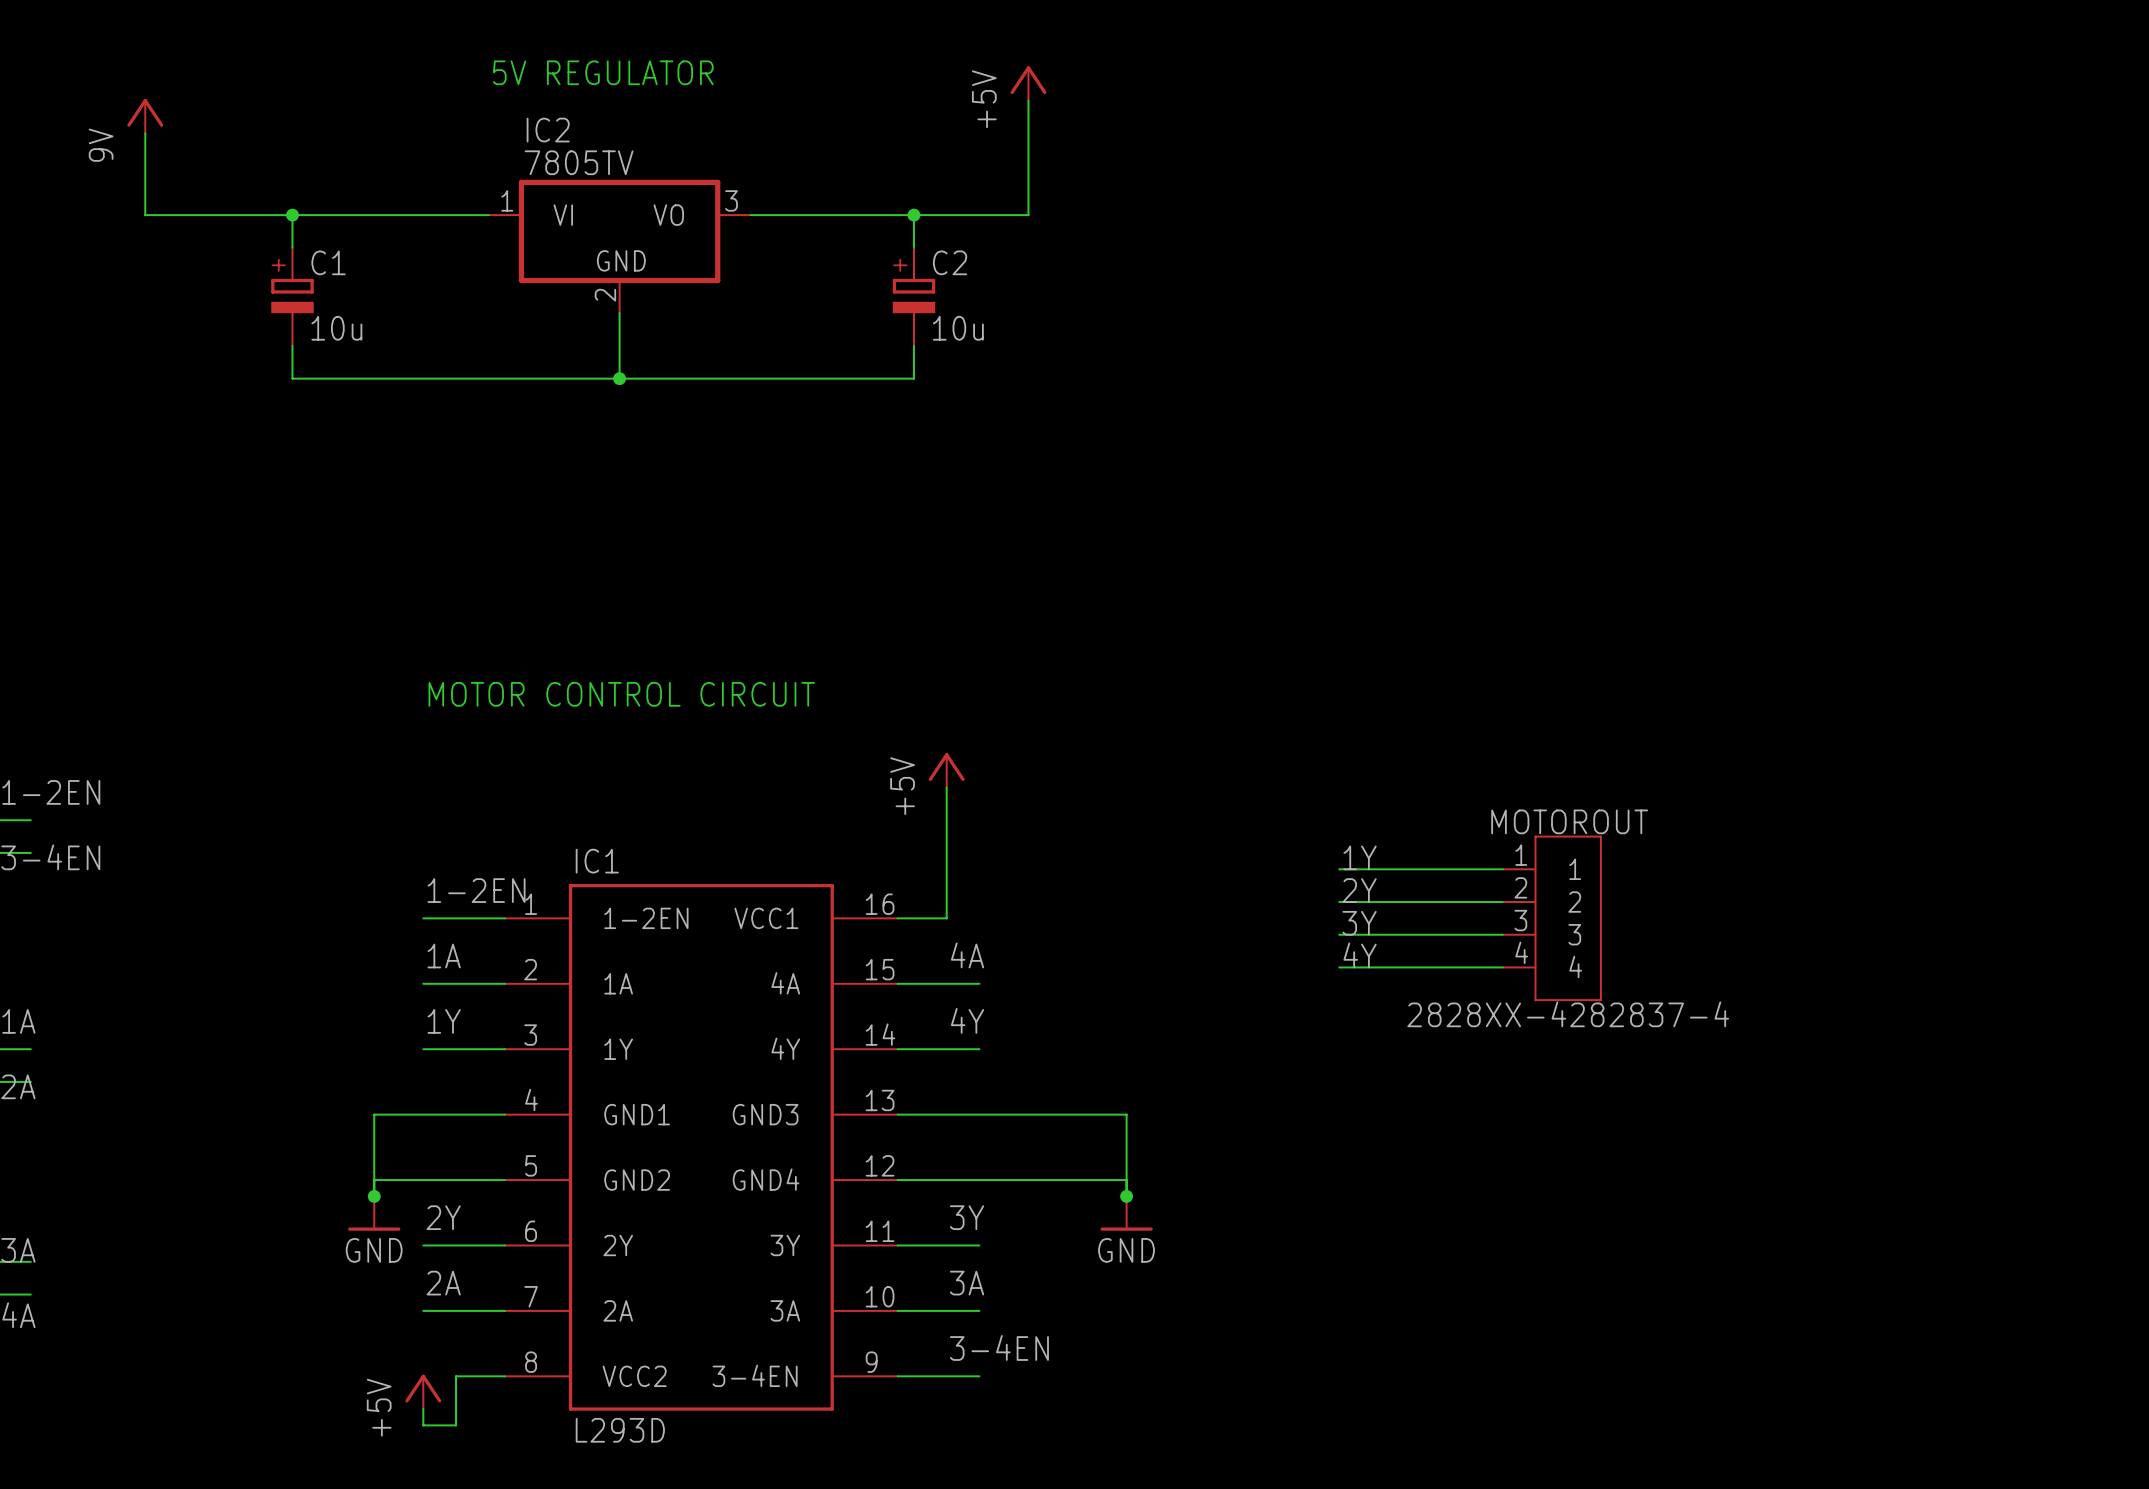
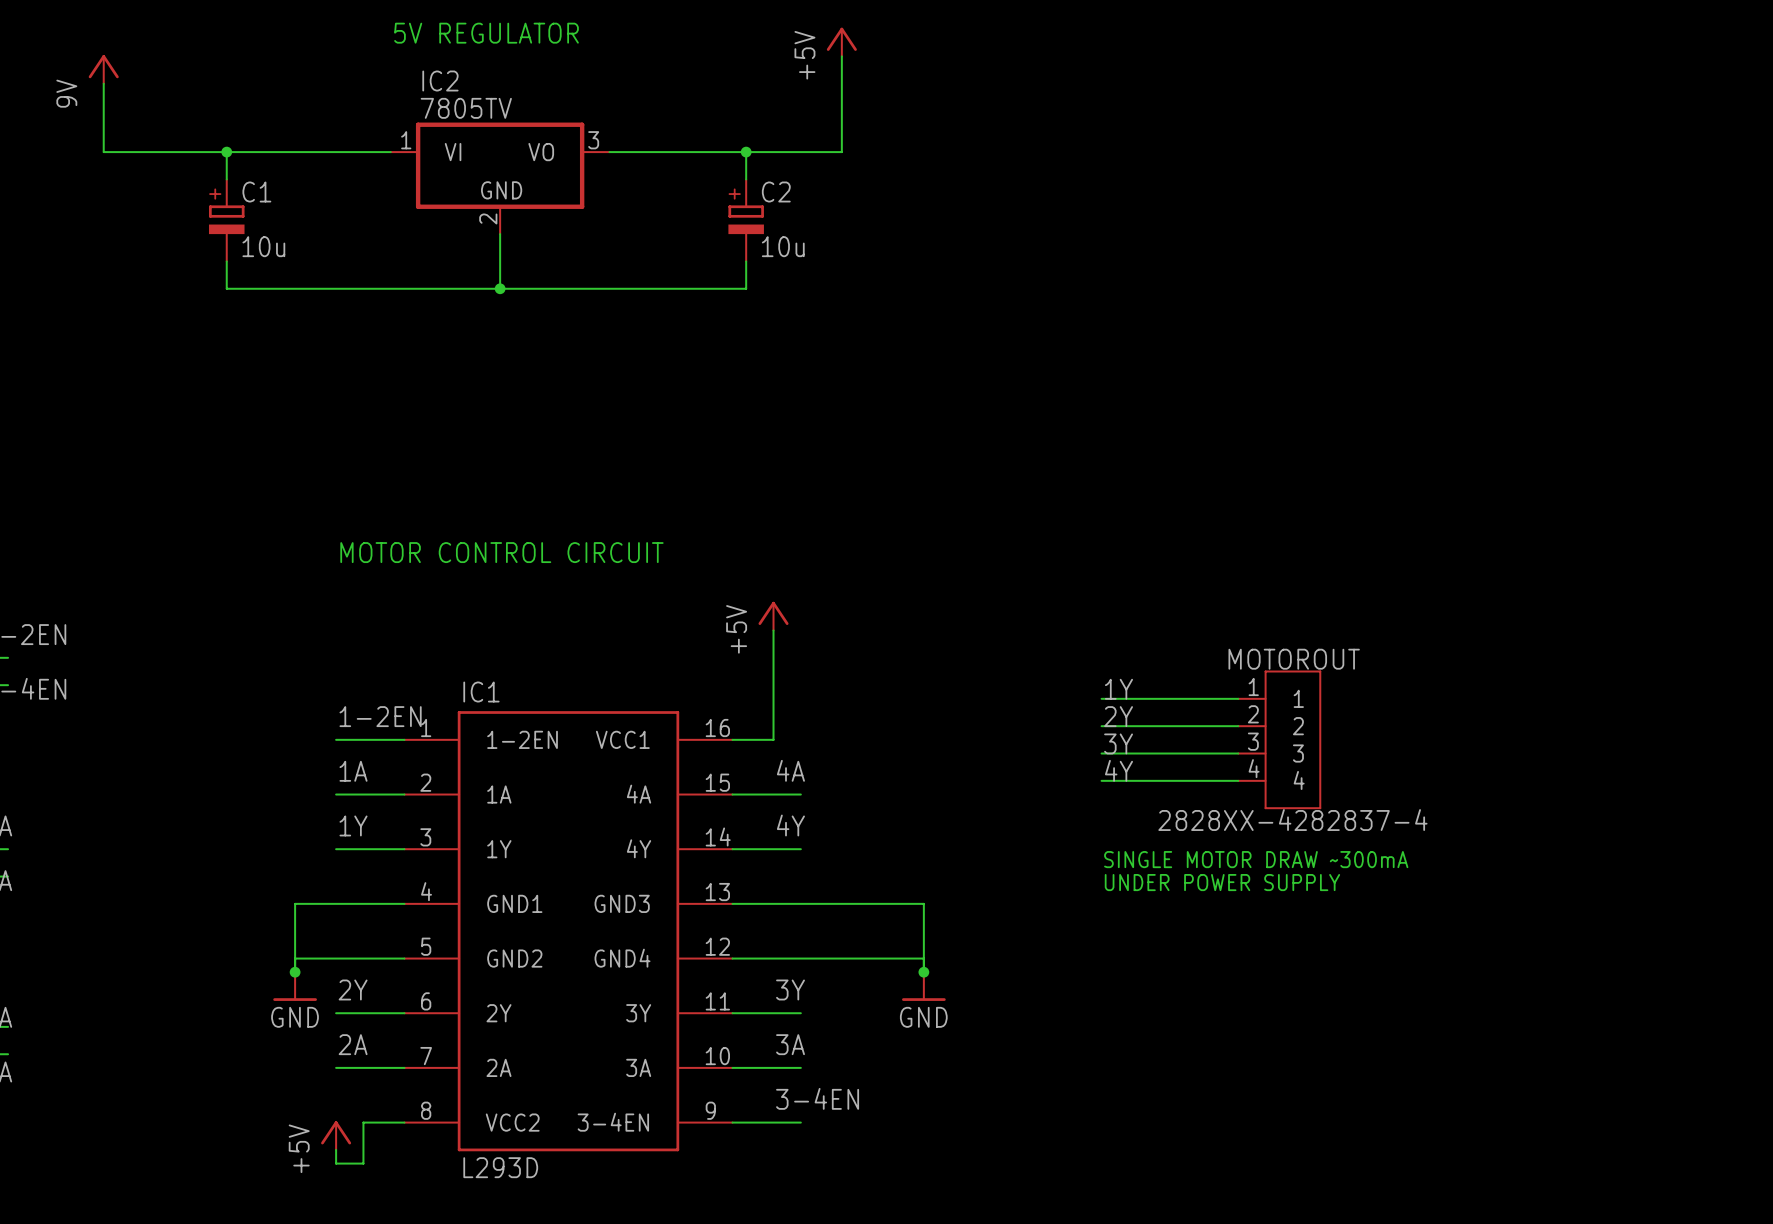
text: none -> SINGLE MOTOR DRAW ~300mA (1256, 859)
text: none -> UNDER POWER SUPPLY (1222, 882)

